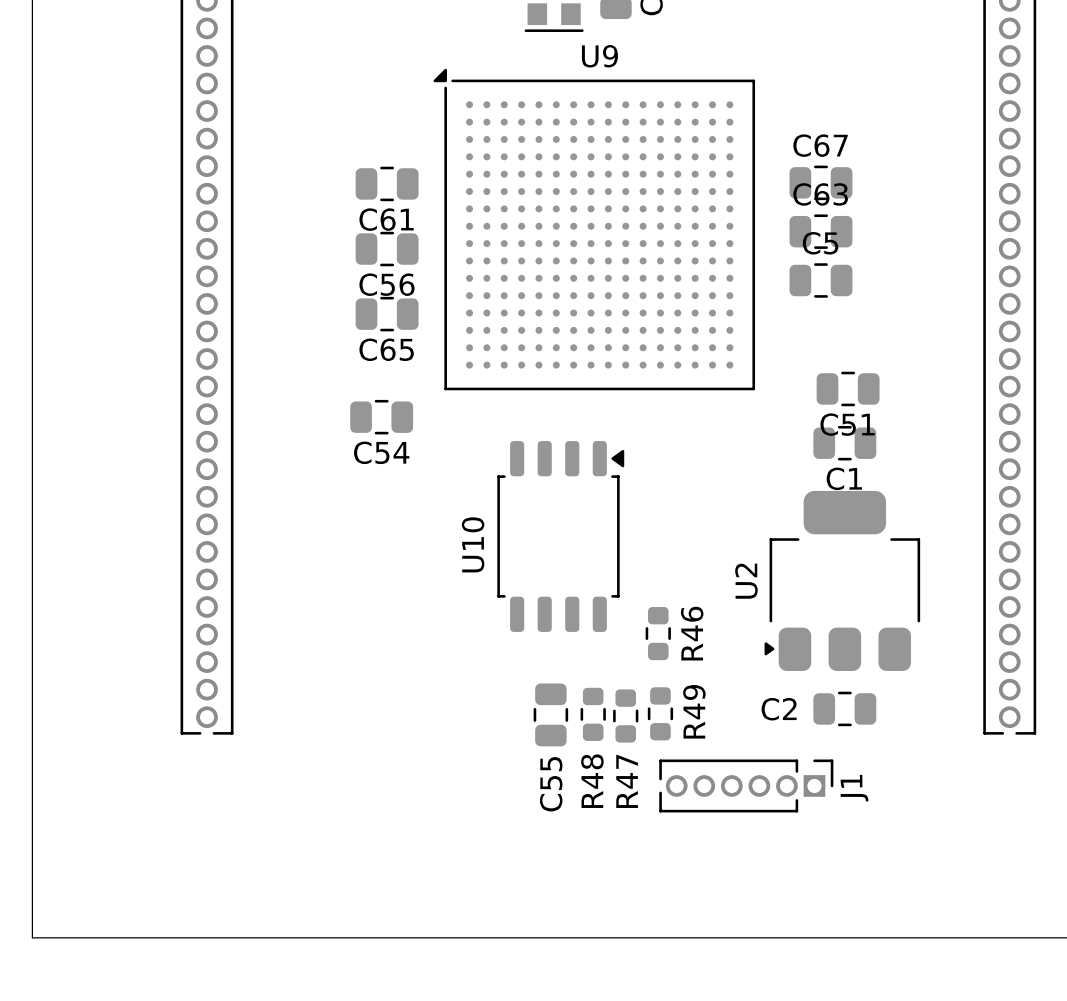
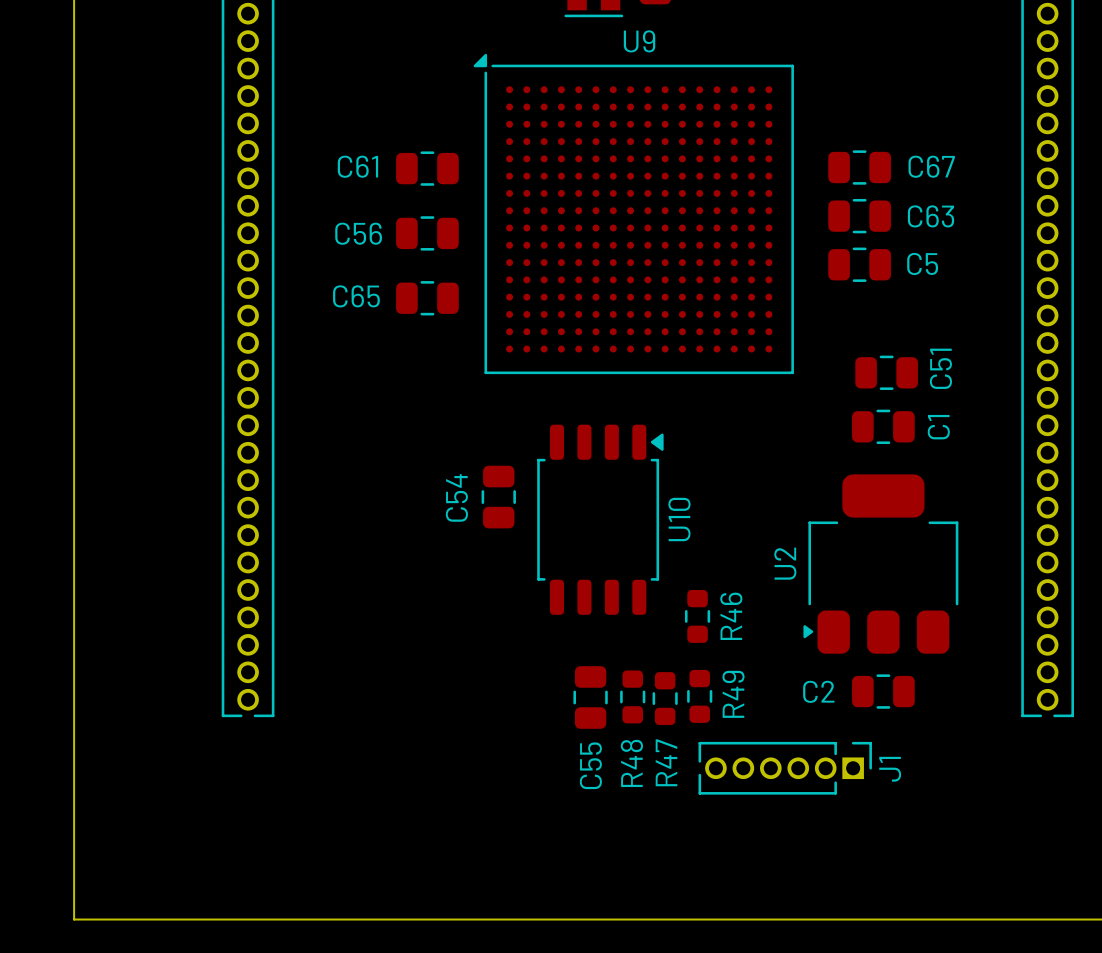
C67 name position: C67 (820, 145) -> C67 (931, 166)
C63 name position: C63 (820, 194) -> C63 (931, 216)
C61 name position: C61 (386, 219) -> C61 (357, 166)
C5 name position: C5 (820, 243) -> C5 (922, 263)
C56 name position: C56 (386, 284) -> C56 (358, 233)
C65 name position: C65 (386, 349) -> C65 (356, 296)
C54 rotation: 0° (381, 417) -> 90° clockwise (498, 497)
C54 position: (381, 417) -> (498, 497)
C51 name rotation: 0° (847, 424) -> 90° counterclockwise (940, 368)
C1 name rotation: 0° (844, 478) -> 90° counterclockwise (938, 427)
C1 name position: C1 (844, 478) -> C1 (938, 427)
U10 name position: U10 (473, 544) -> U10 (679, 519)

